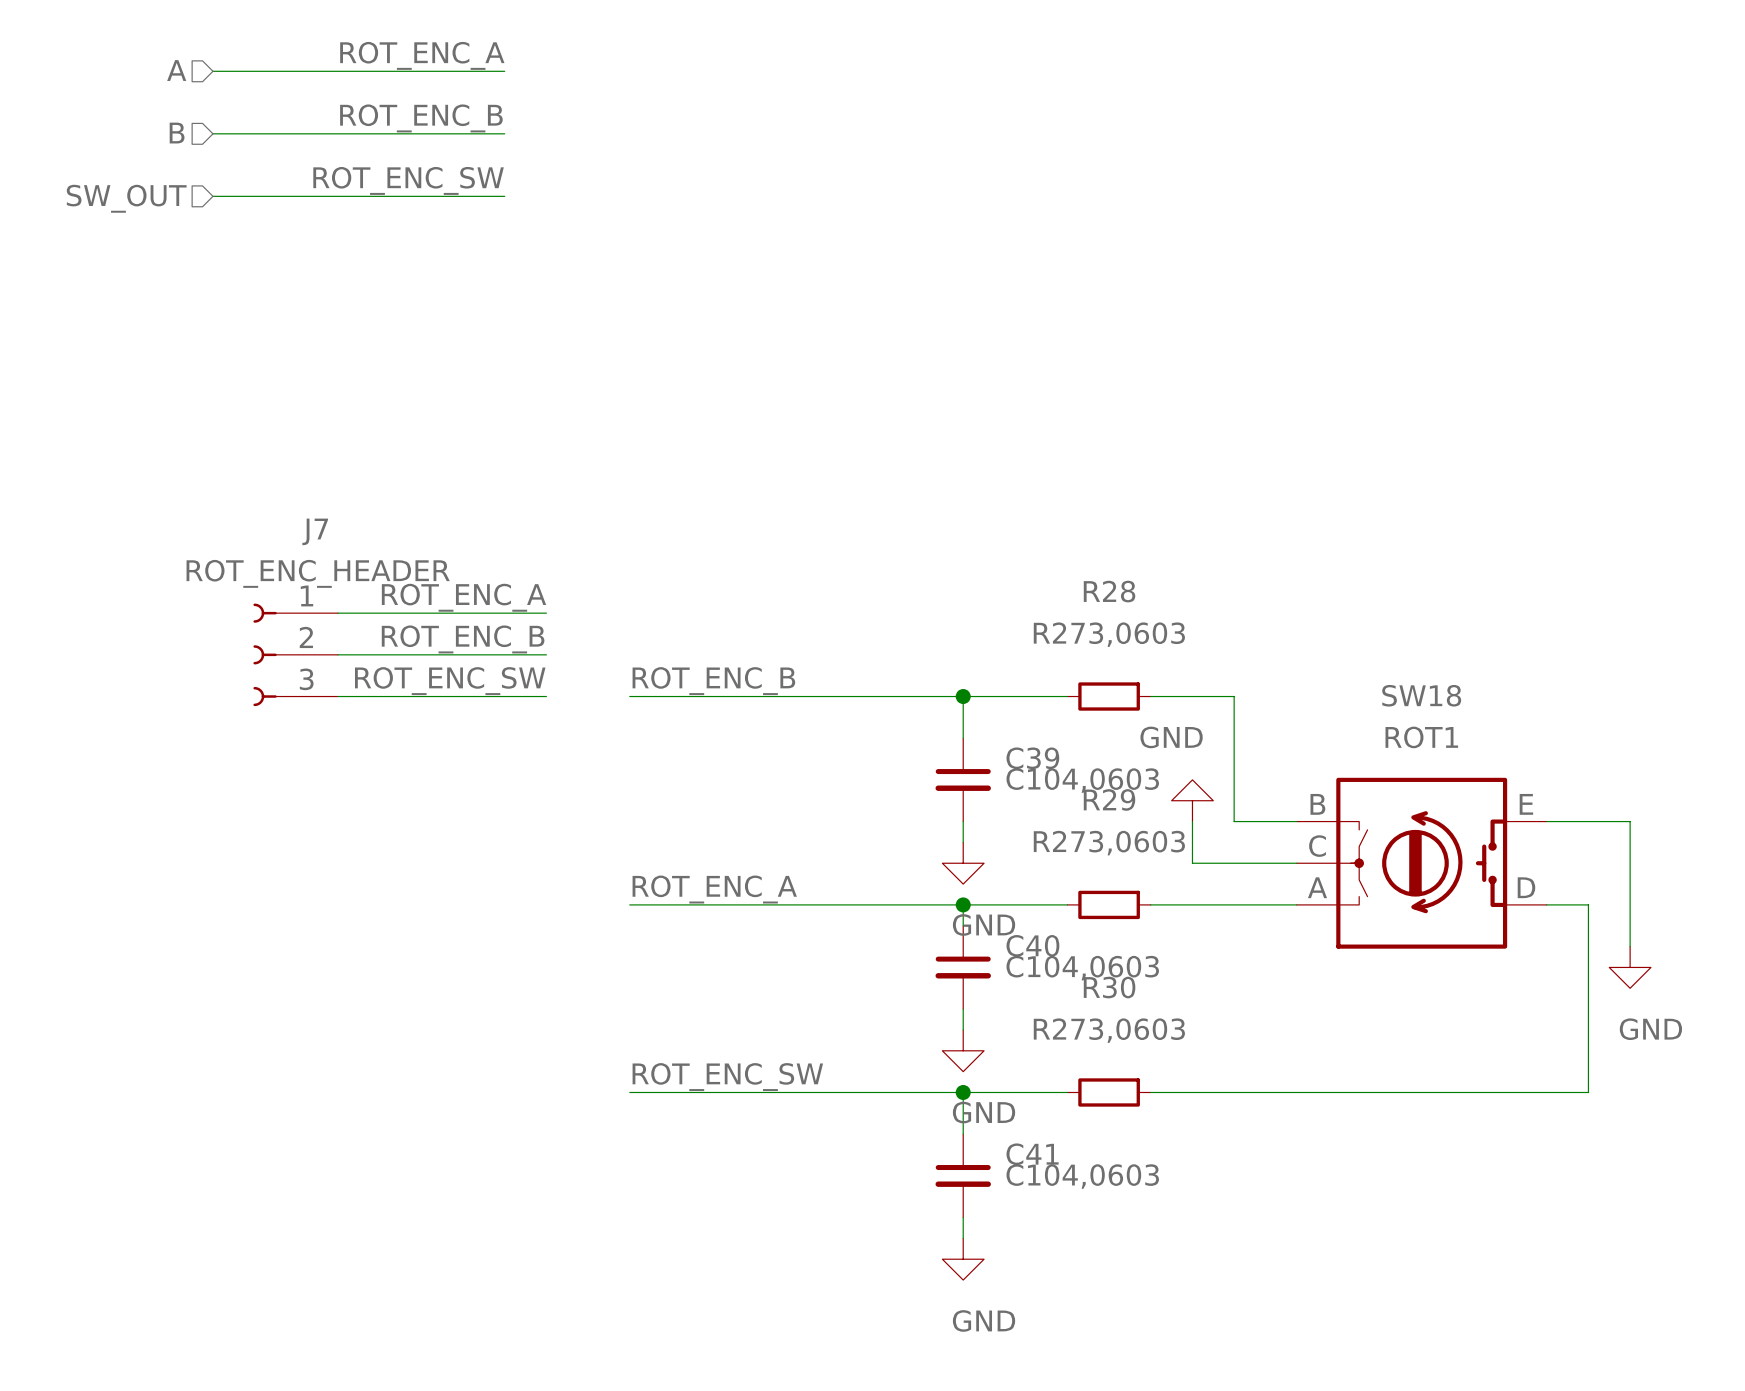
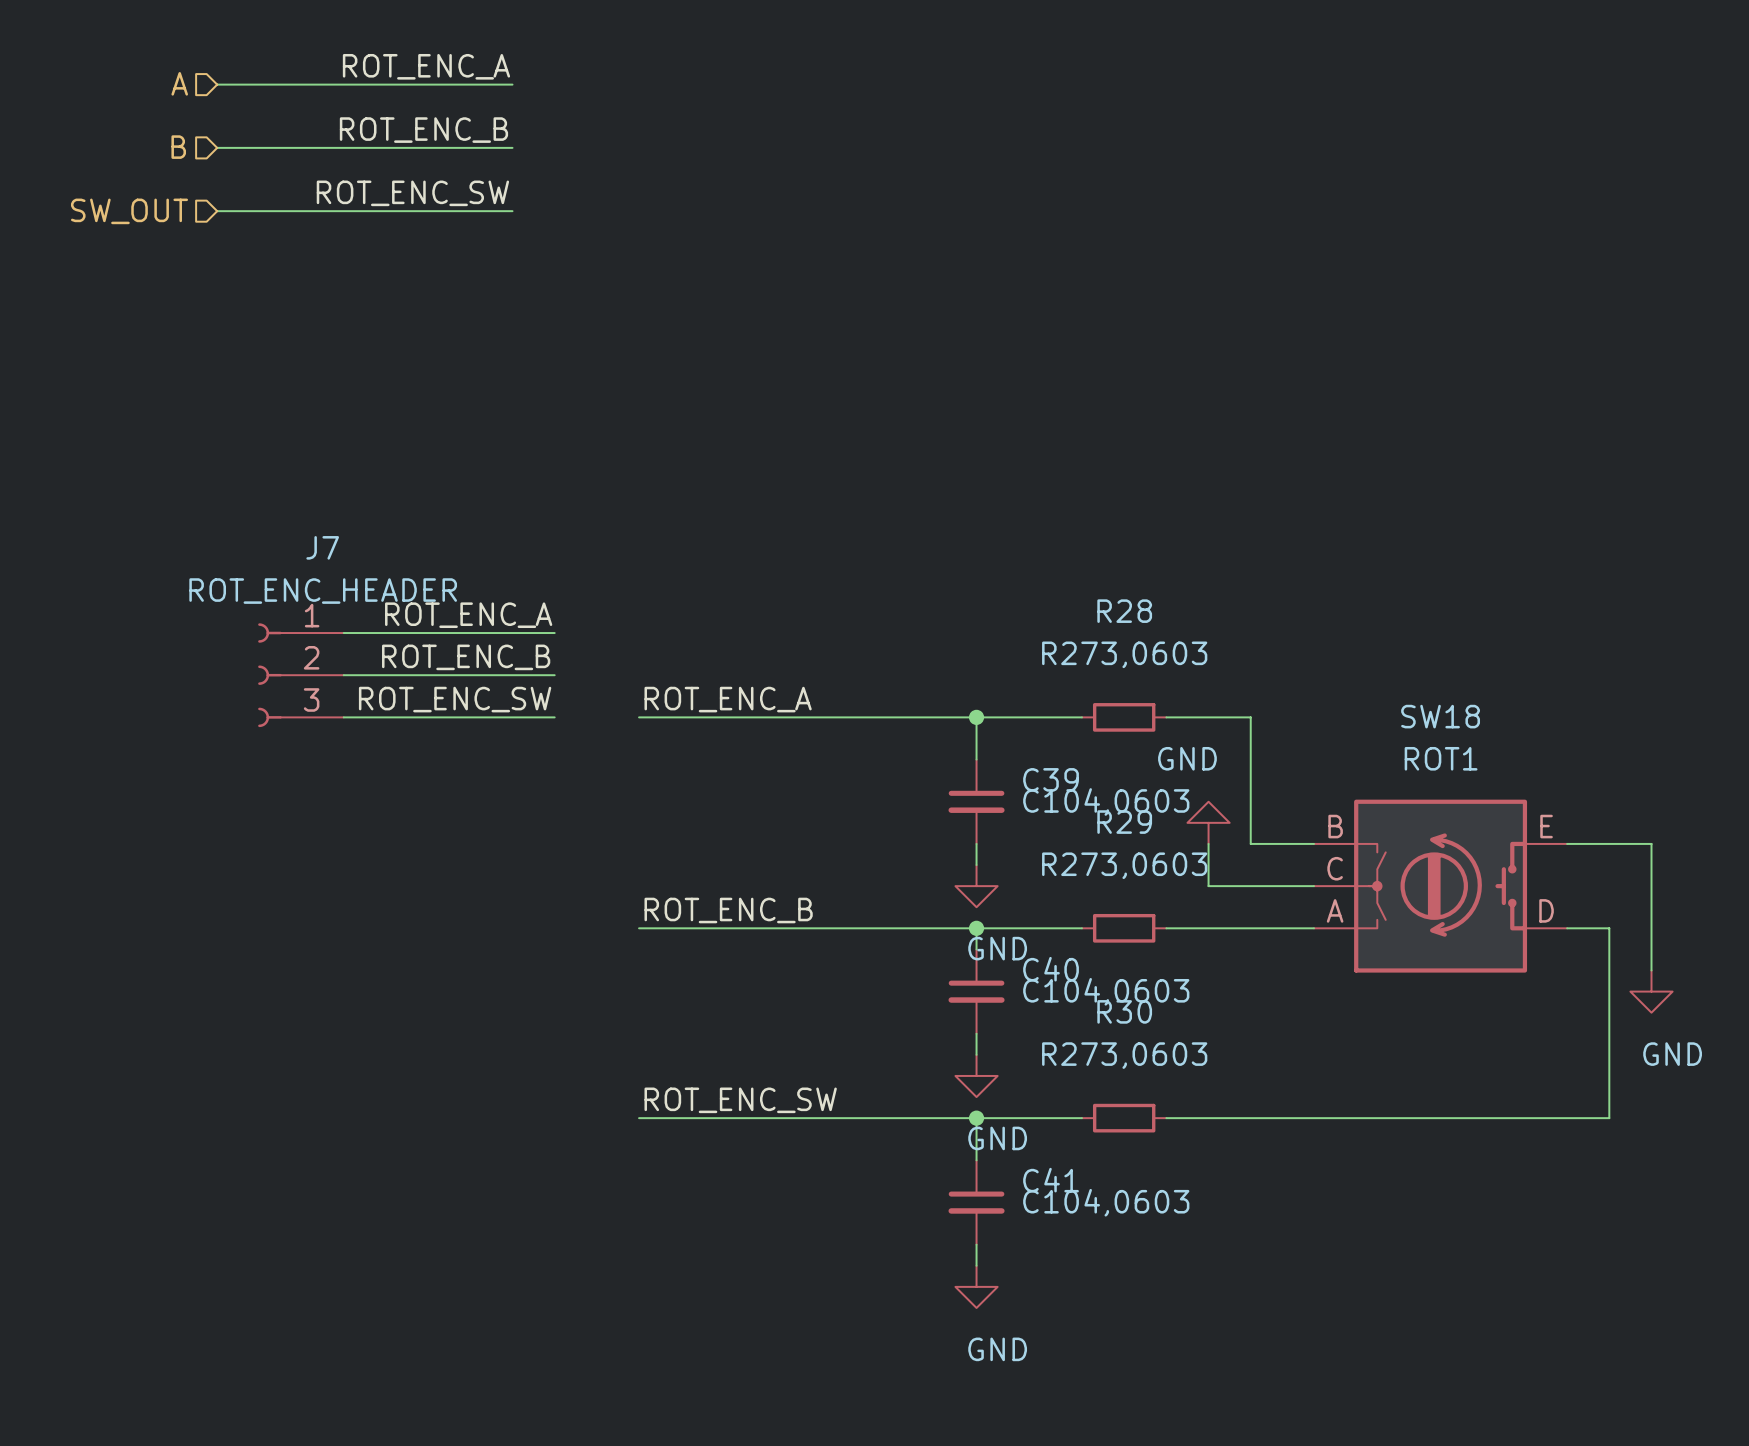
label: ROT_ENC_B (713, 681) -> ROT_ENC_A (728, 699)
label: ROT_ENC_A (714, 889) -> ROT_ENC_B (728, 910)

